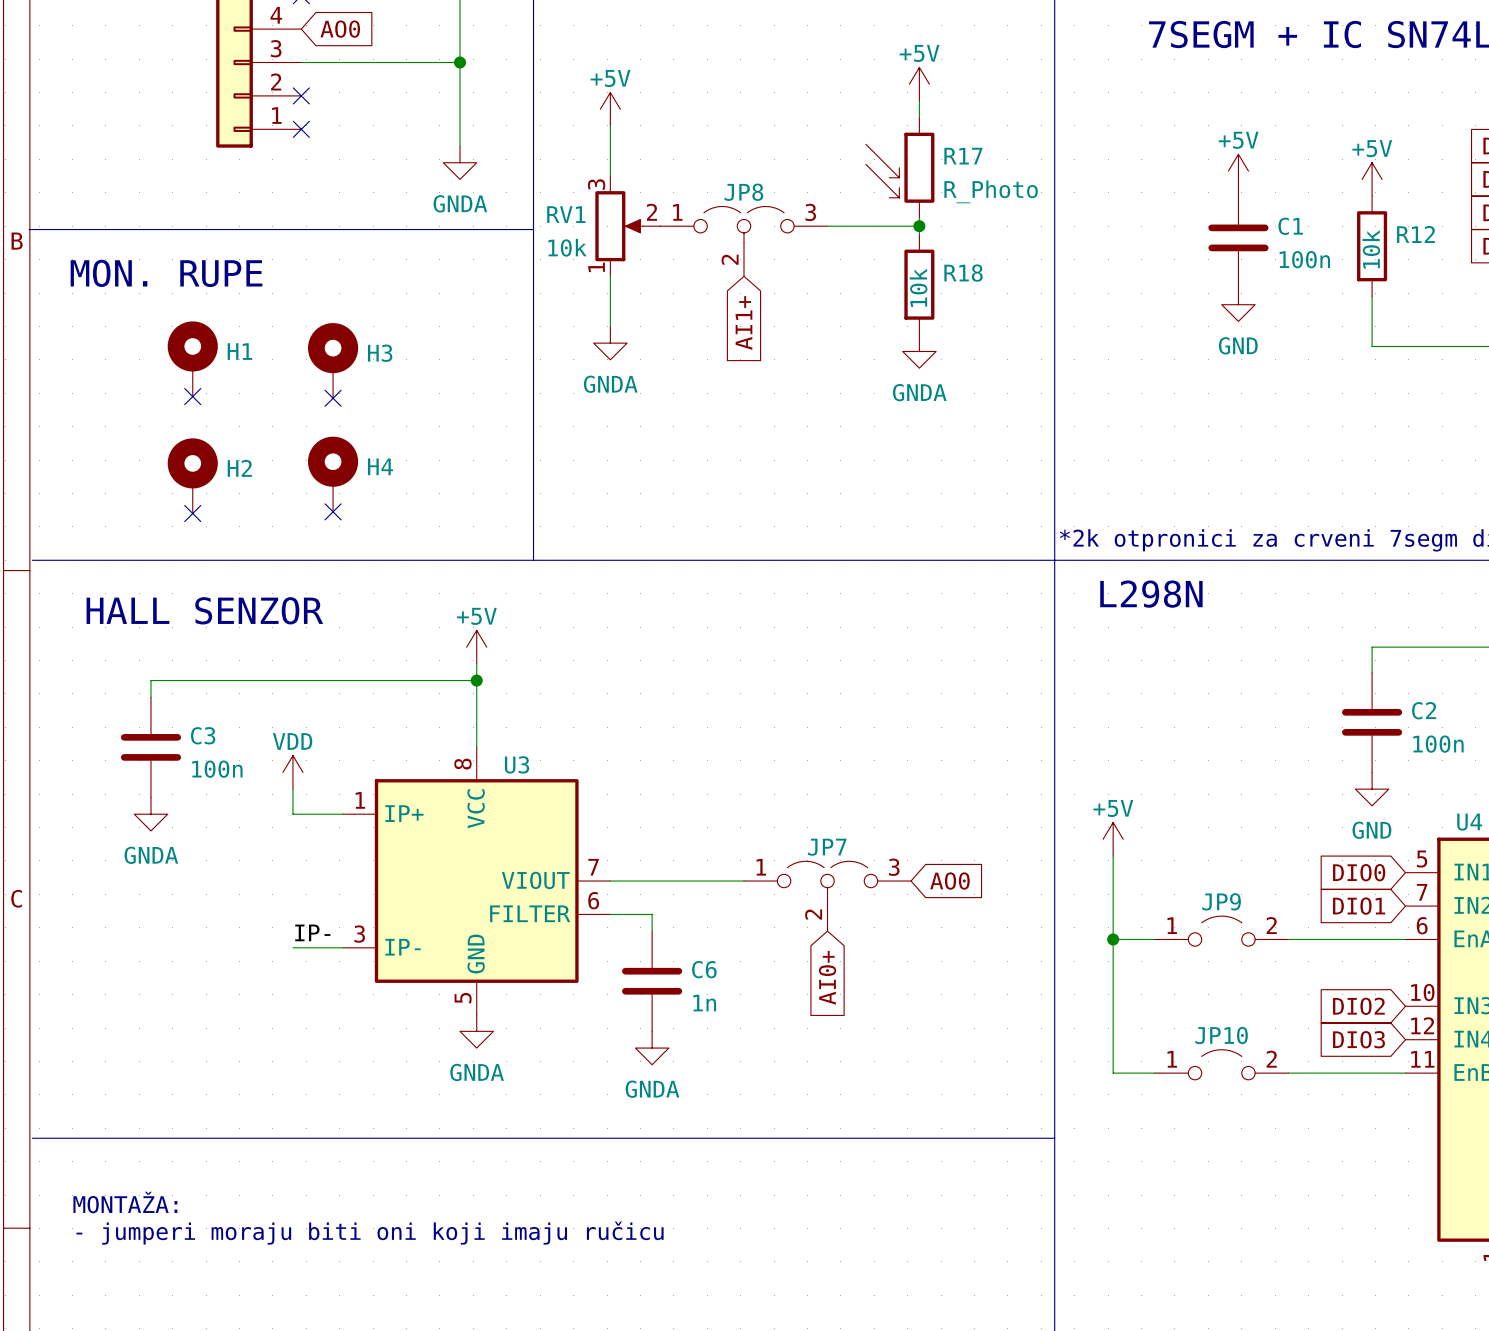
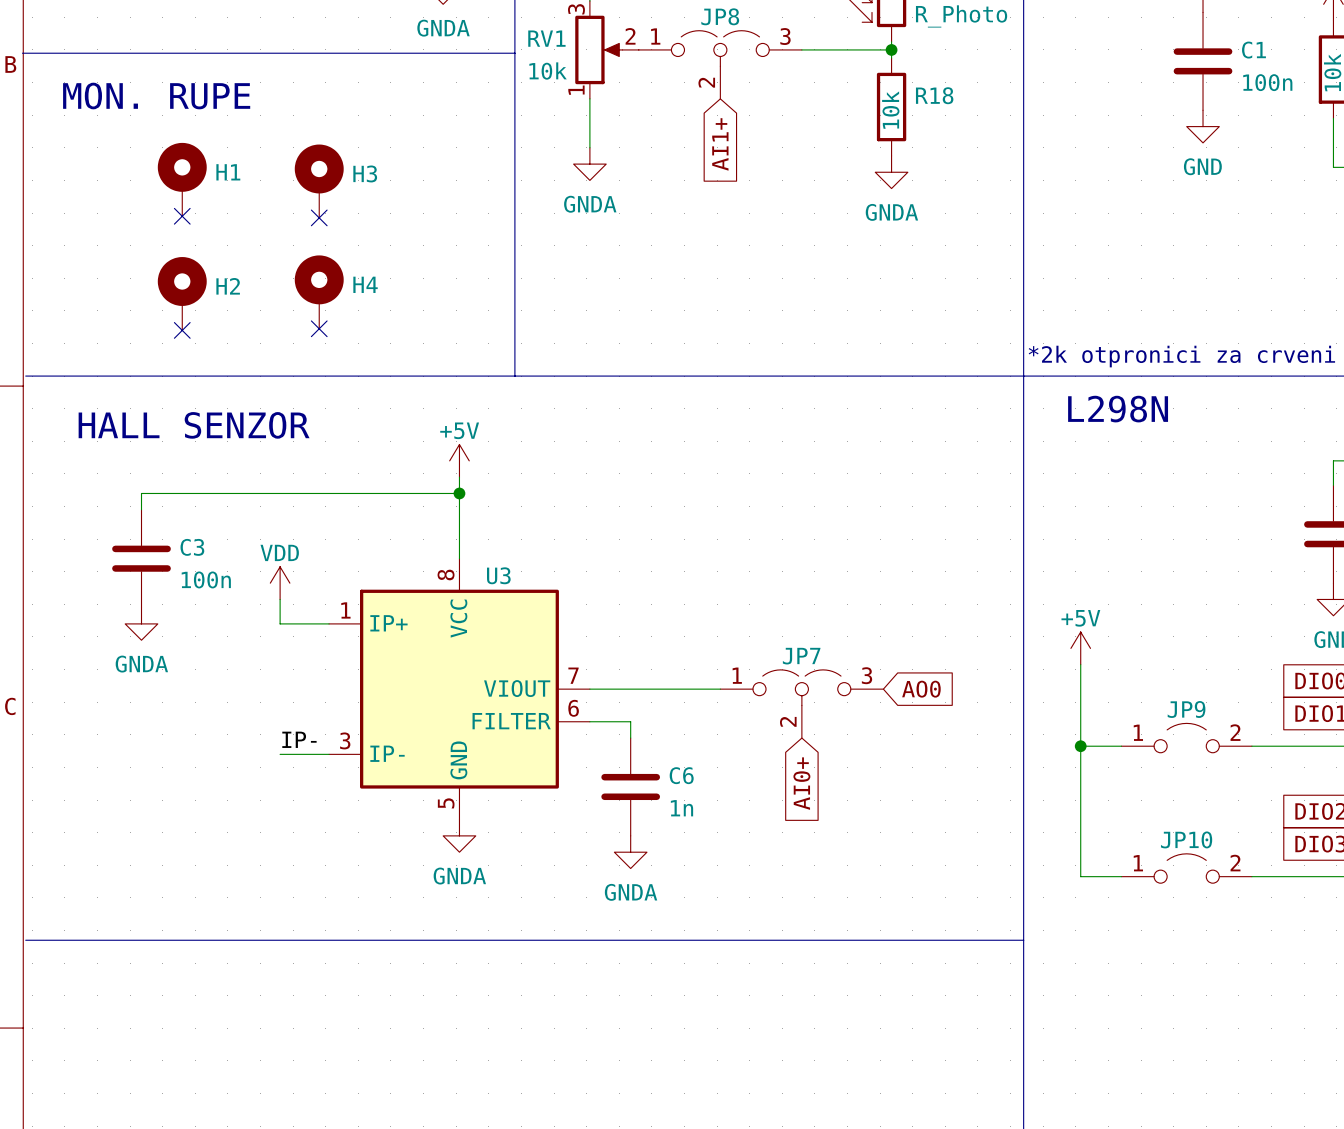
text: MONTAŽA: (125, 1202) -> none
text: - jumperi moraju biti oni koji imaju ručicu (370, 1233) -> none

